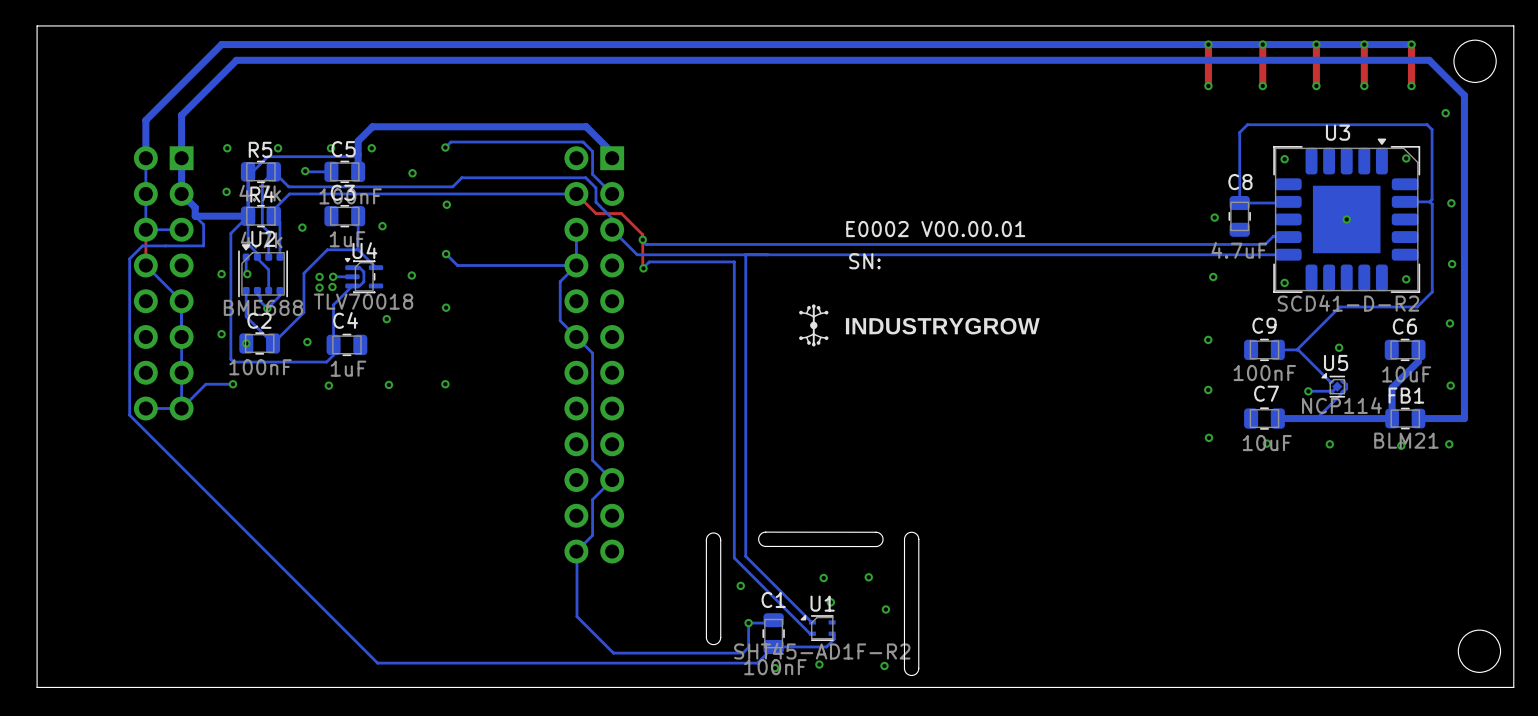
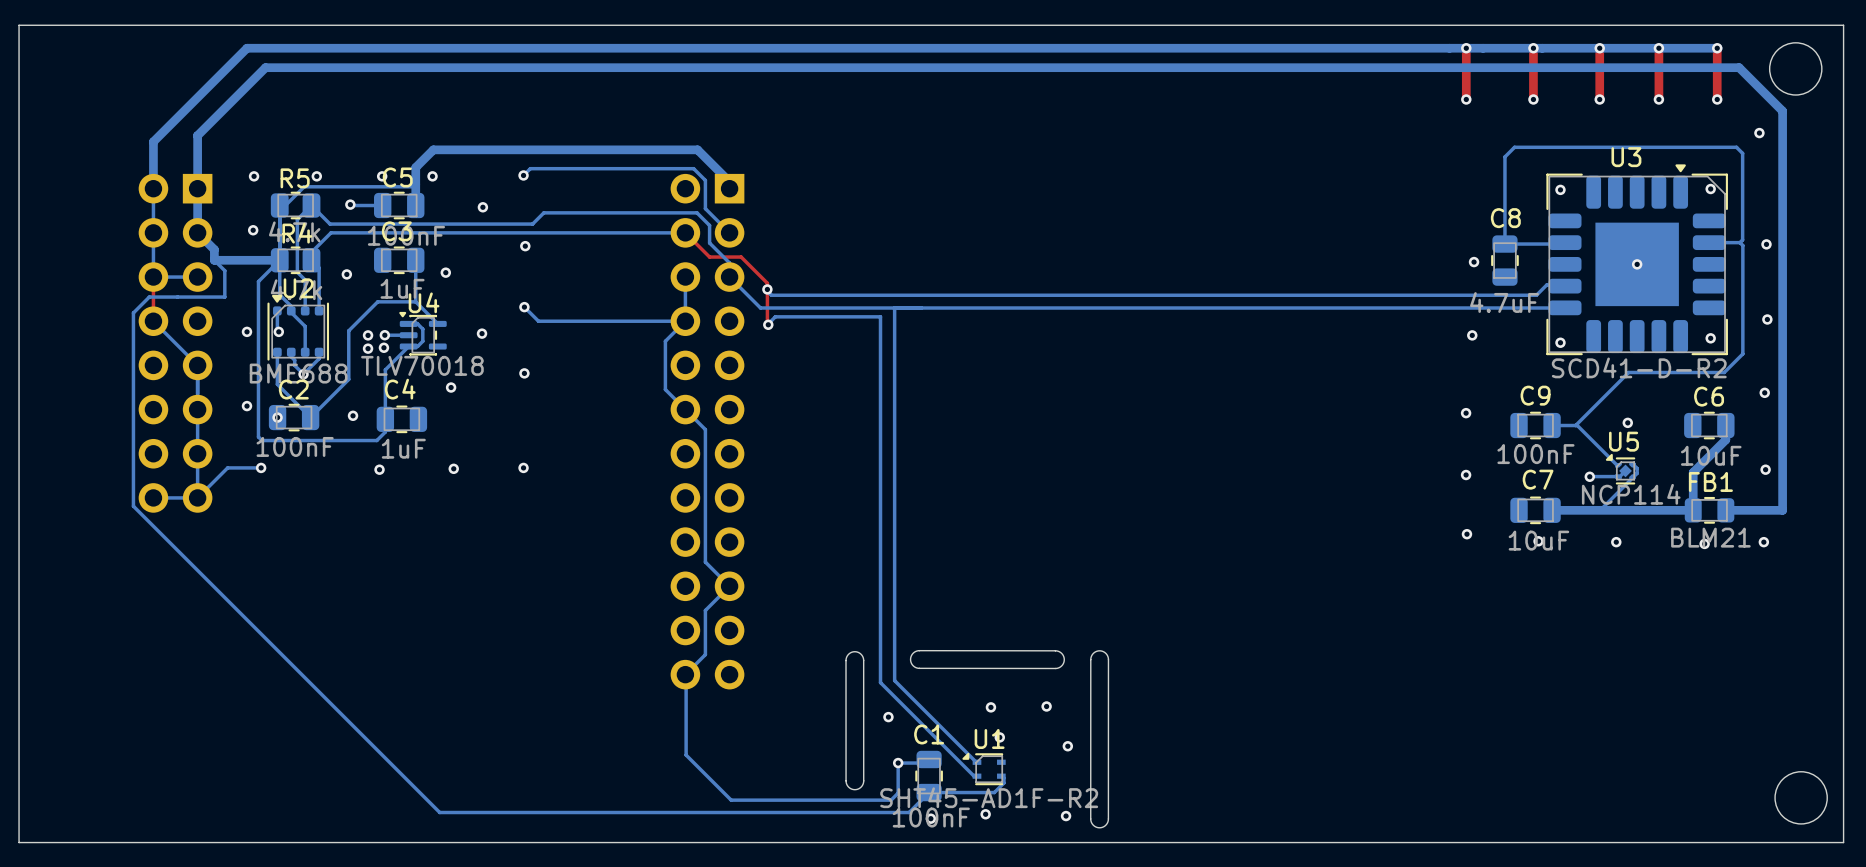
text: E0002 V00.00.01 (935, 229) -> none
text: SN: (864, 261) -> none
drawing: [799, 304, 1040, 347] -> none

